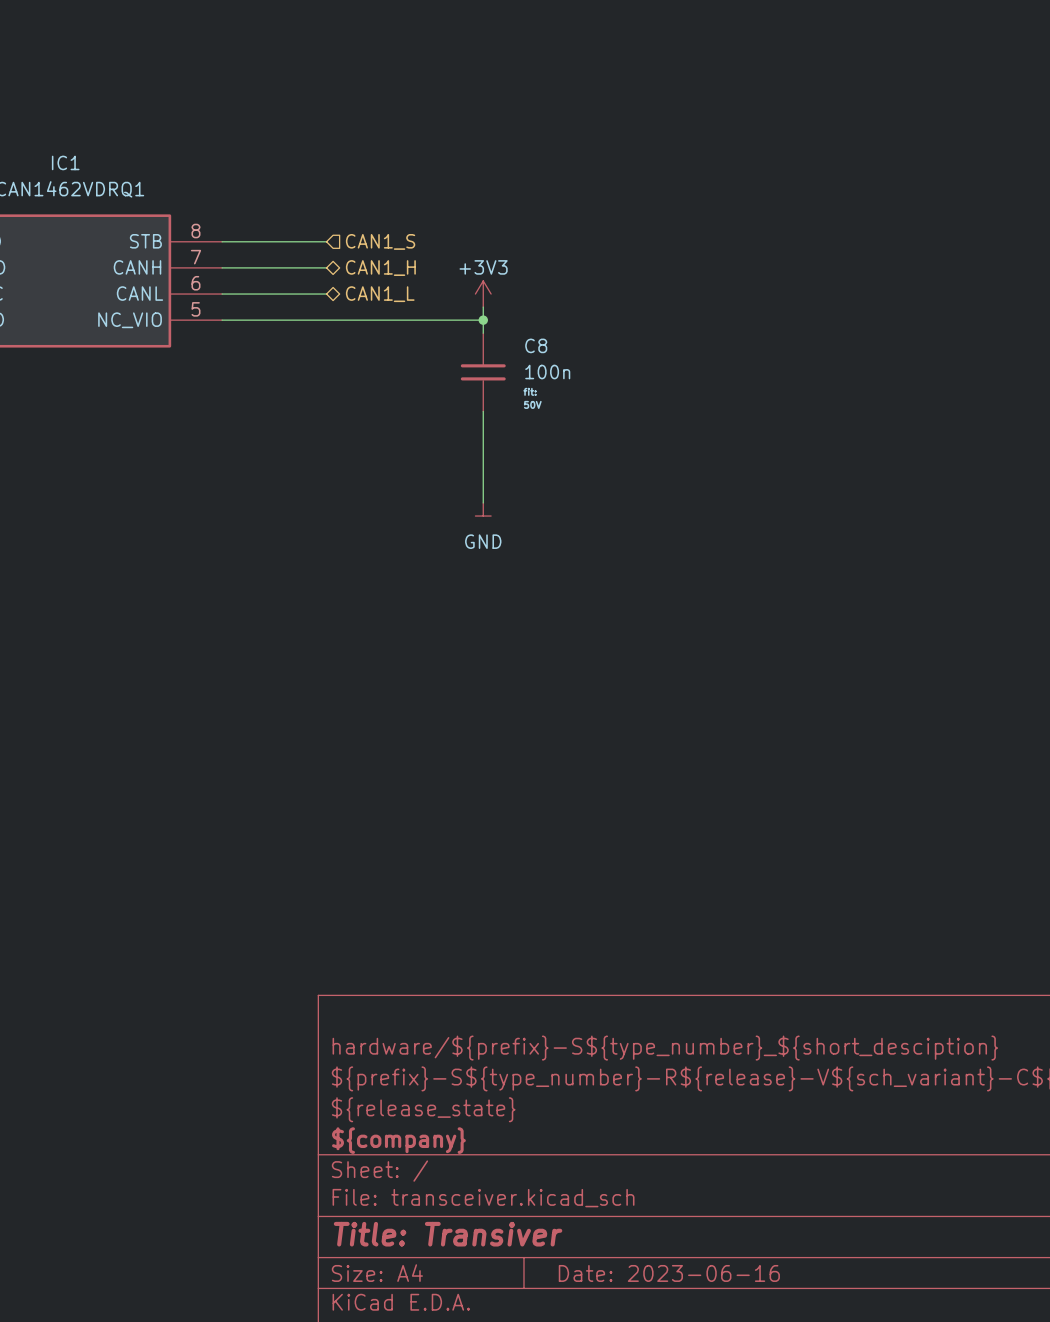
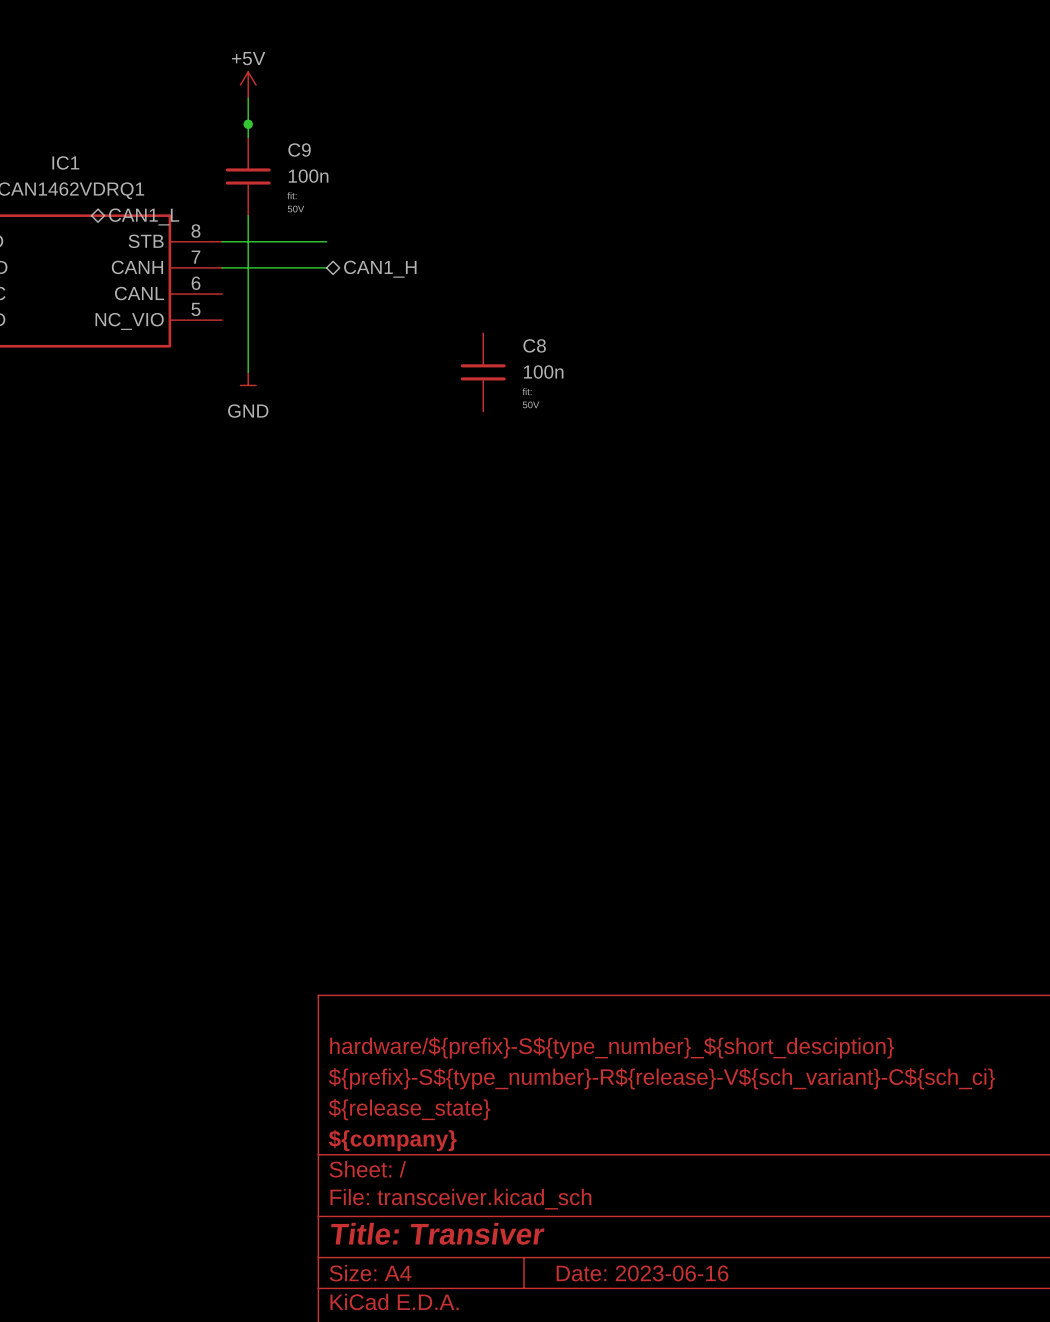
power symbol: none -> +5V (248, 85)
wire: none -> (248, 98) (248, 137)
junction: none -> (248, 124)
C9: none -> (248, 176)
wire: none -> (248, 215) (248, 372)
hierarchical label: CAN1_S (380, 241) -> none
wire: (222, 294) (326, 294) -> none
hierarchical label position: CAN1_L (380, 294) -> CAN1_L (144, 216)
power symbol: +3V3 (483, 294) -> none
wire: (483, 307) (483, 333) -> none
wire: (222, 320) (483, 320) -> none
junction: (483, 320) -> none
power symbol: none -> GND (248, 378)
wire: (483, 411) (483, 502) -> none
power symbol: GND (483, 509) -> none

